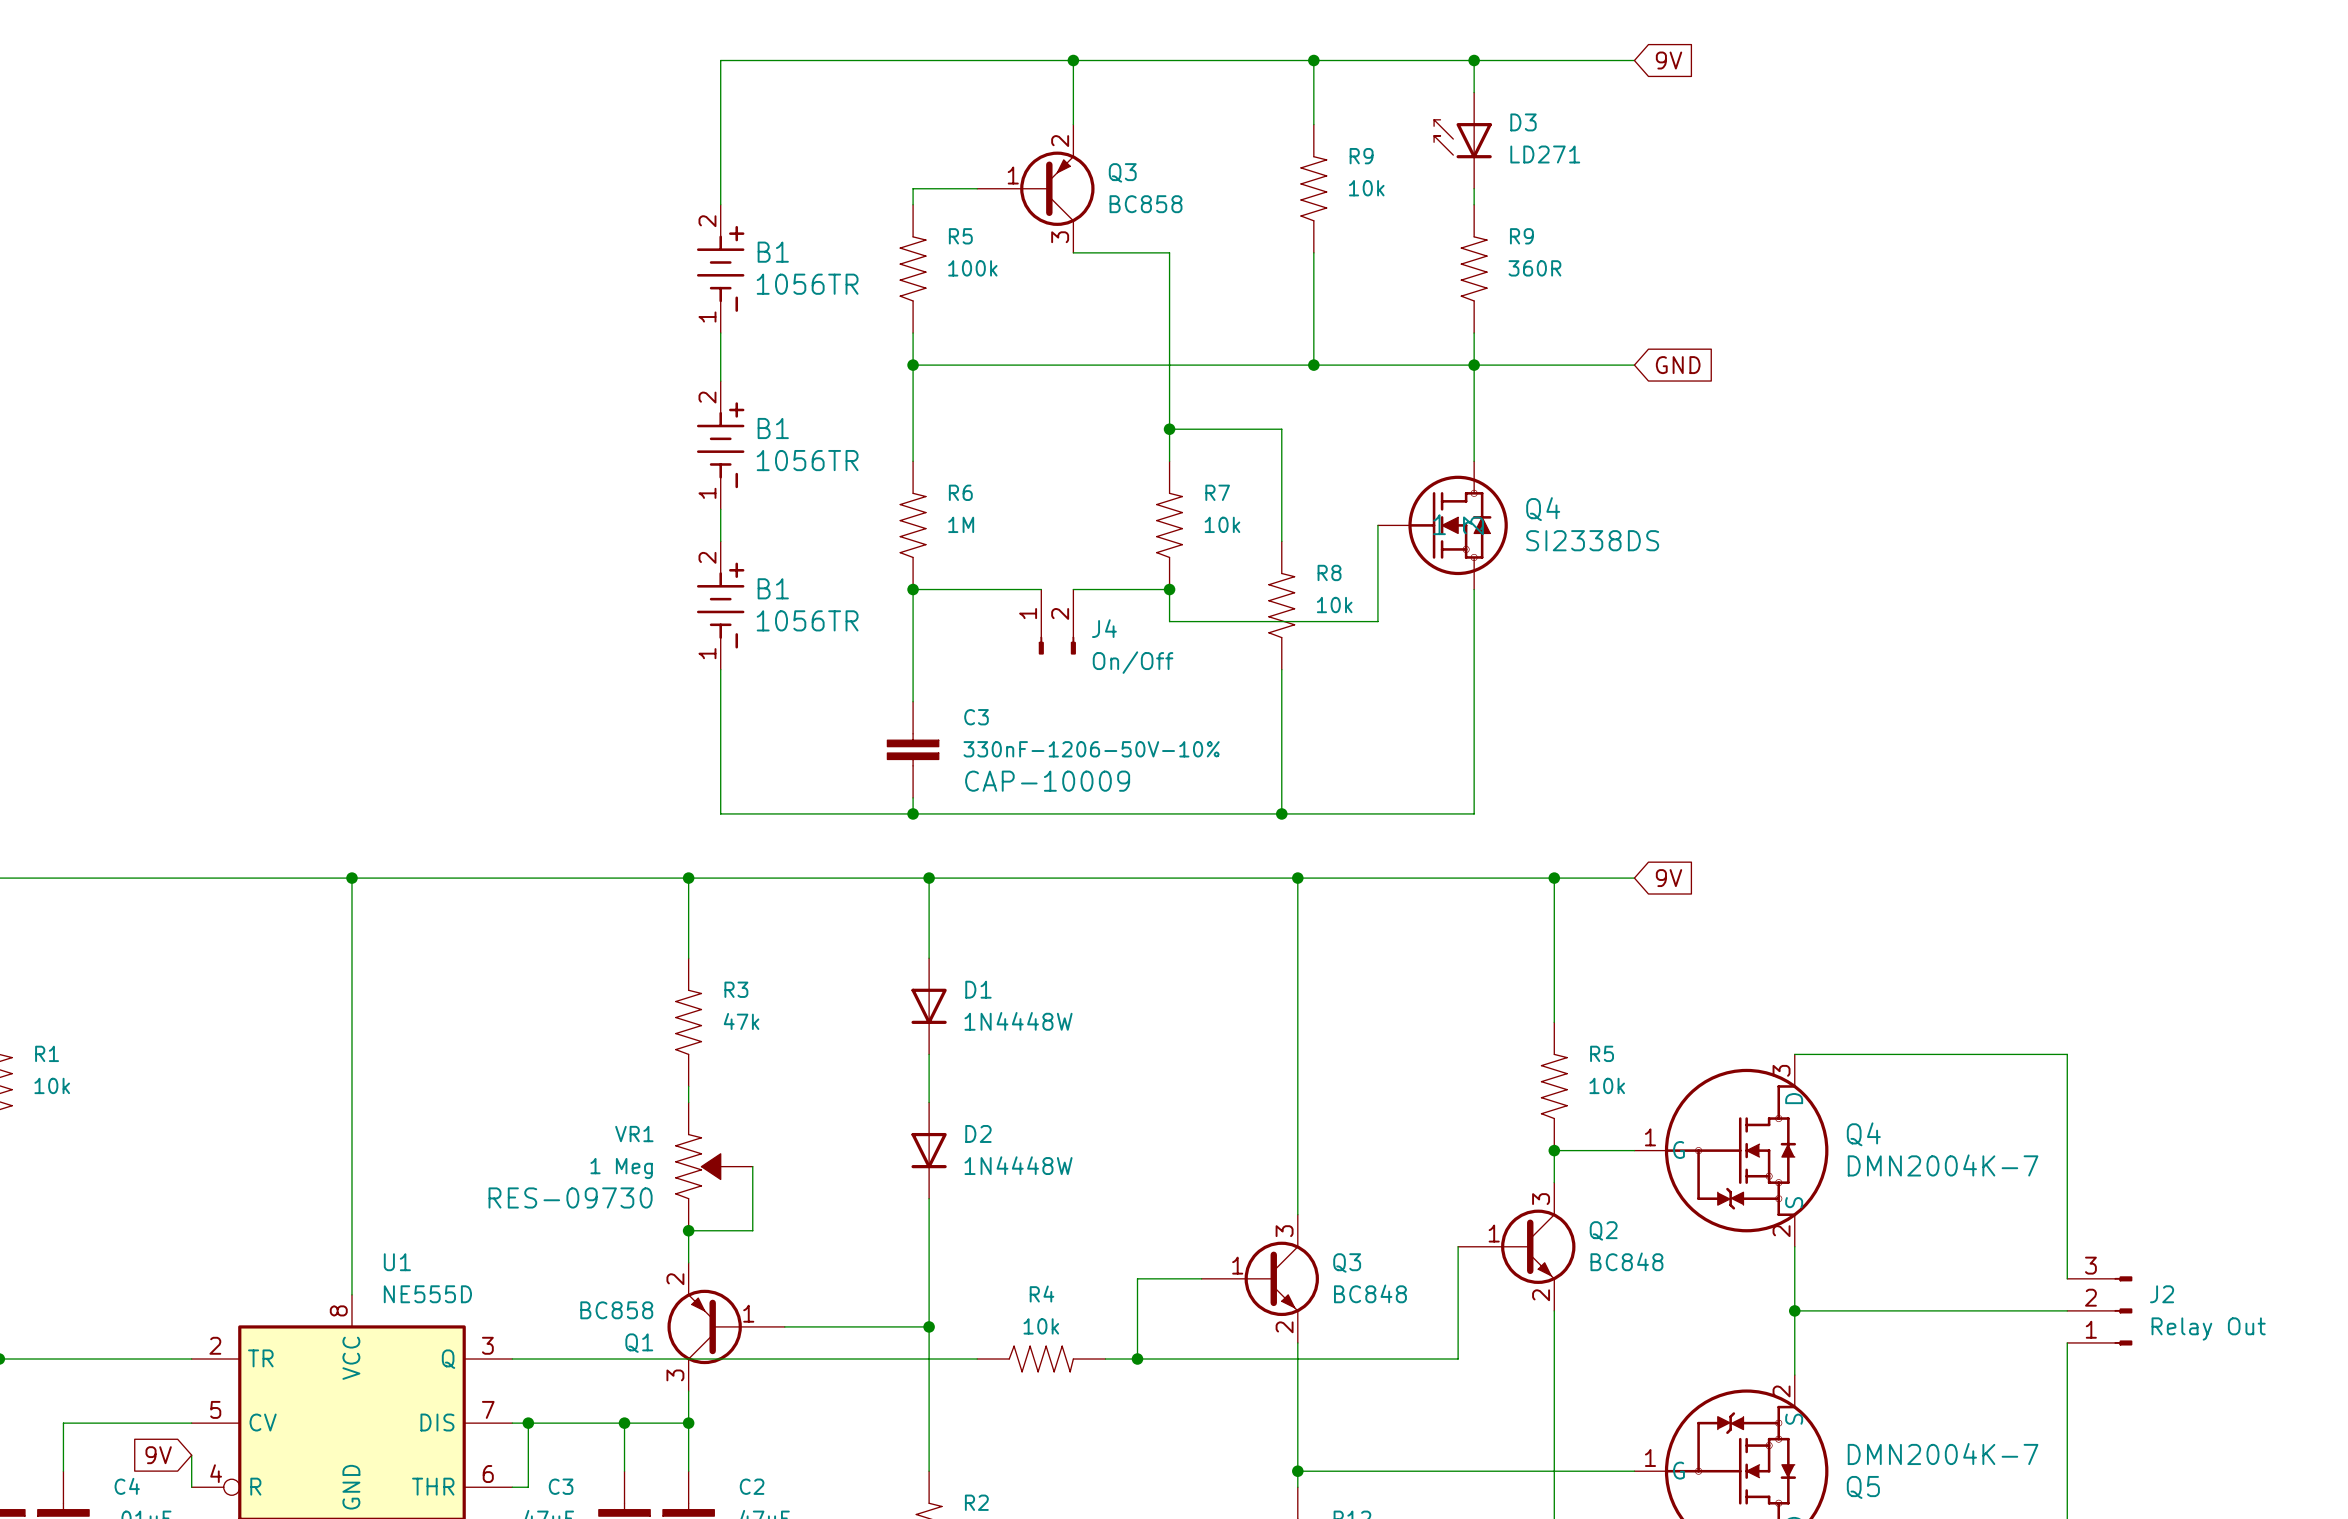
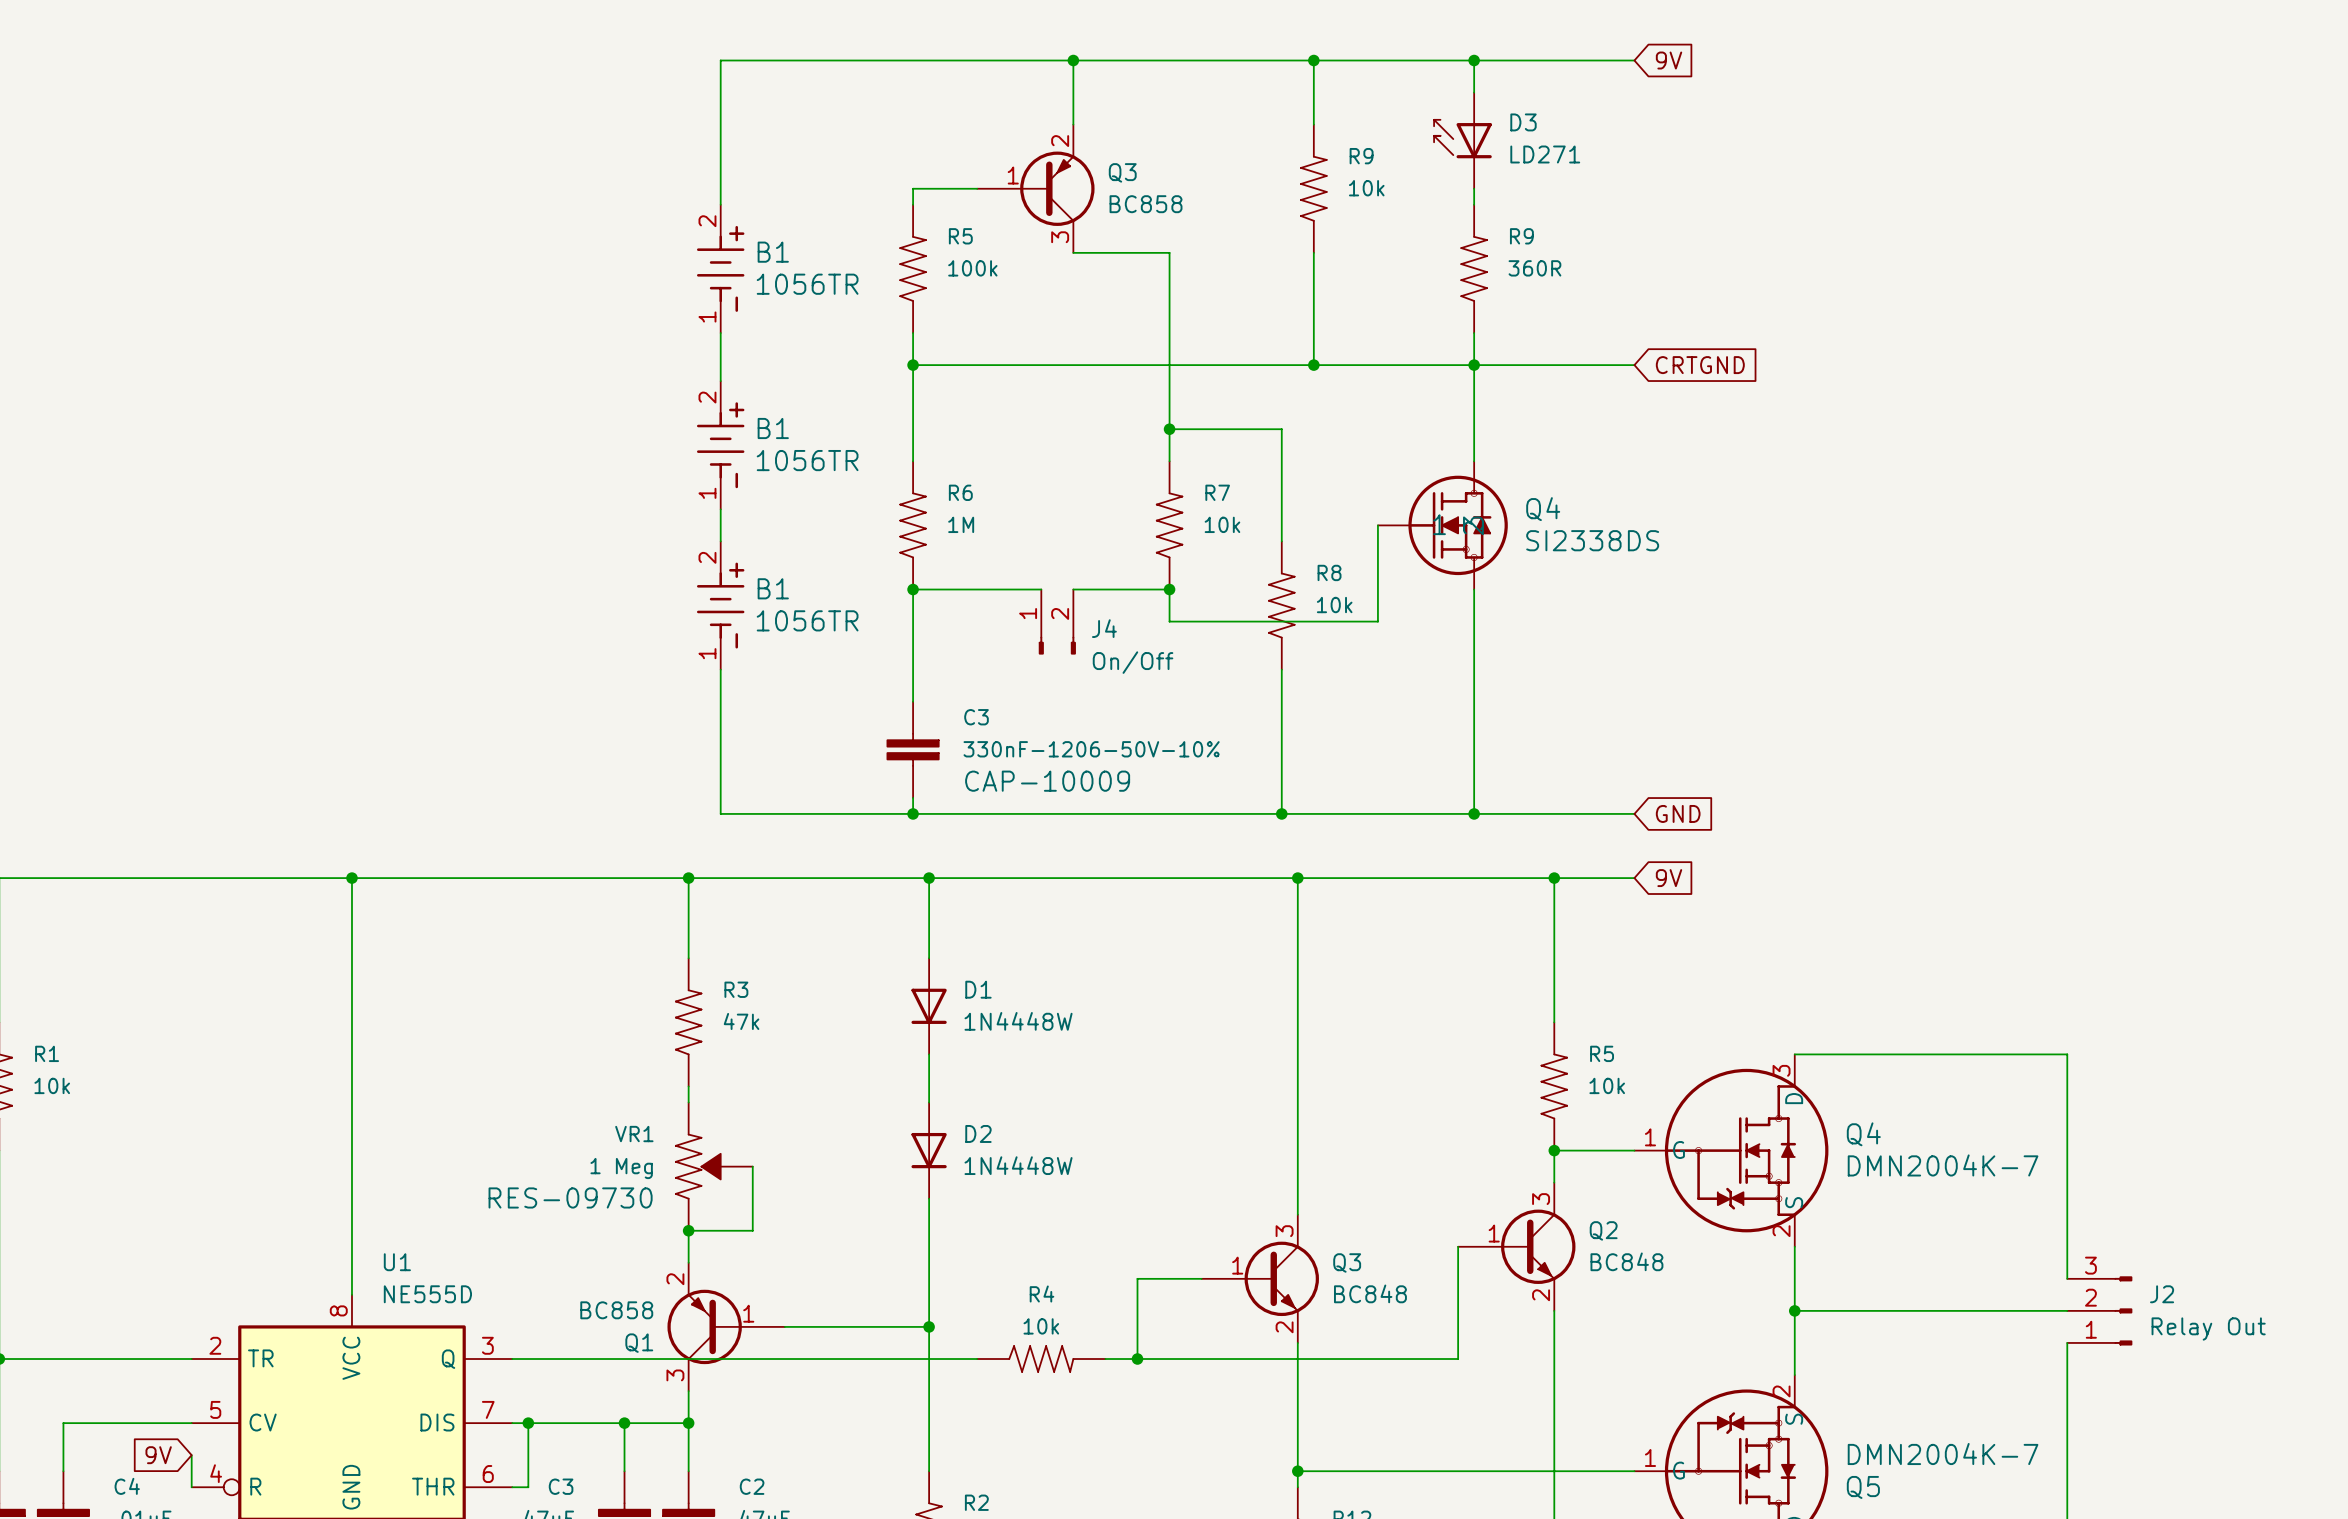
global label: GND (1678, 365) -> CRTGND (1700, 365)
wire: none -> (1474, 813) (1634, 813)
junction: none -> (1474, 813)
global label: none -> GND (1678, 813)

